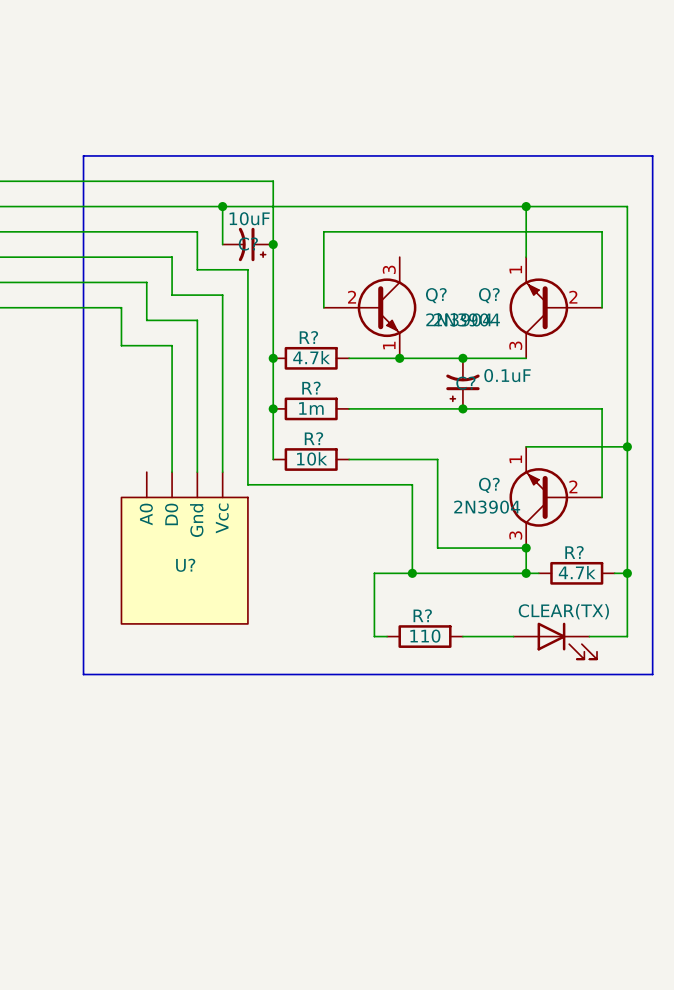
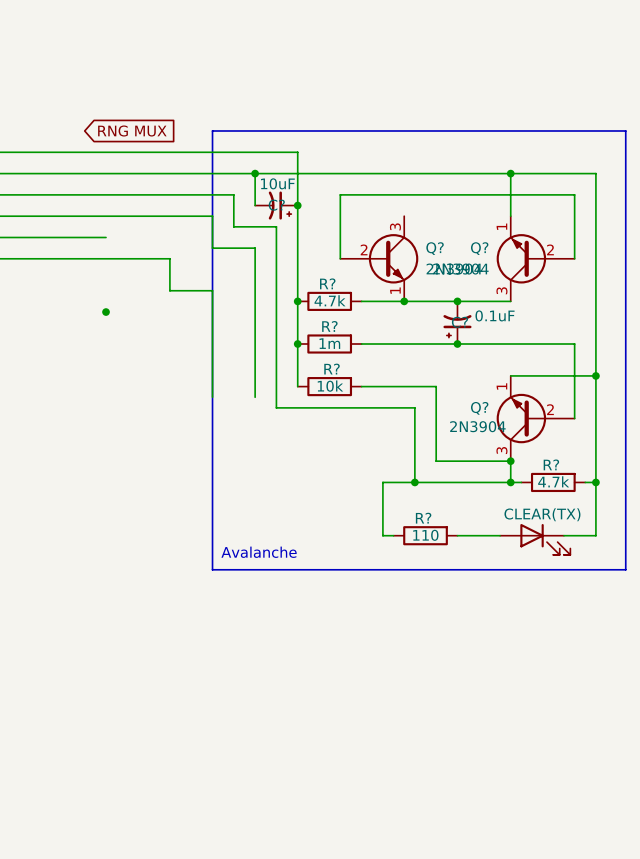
global label: none -> RNG MUX (132, 131)
line: (172, 155) (83, 155) (83, 674) (652, 674) (652, 155) -> (212, 130) (212, 569) (625, 569) (625, 130) (617, 130)
wire: (45, 282) (146, 282) (146, 320) (197, 320) (197, 472) -> none
junction: none -> (106, 312)
U?: (184, 548) -> none
text: none -> Avalanche (259, 552)

